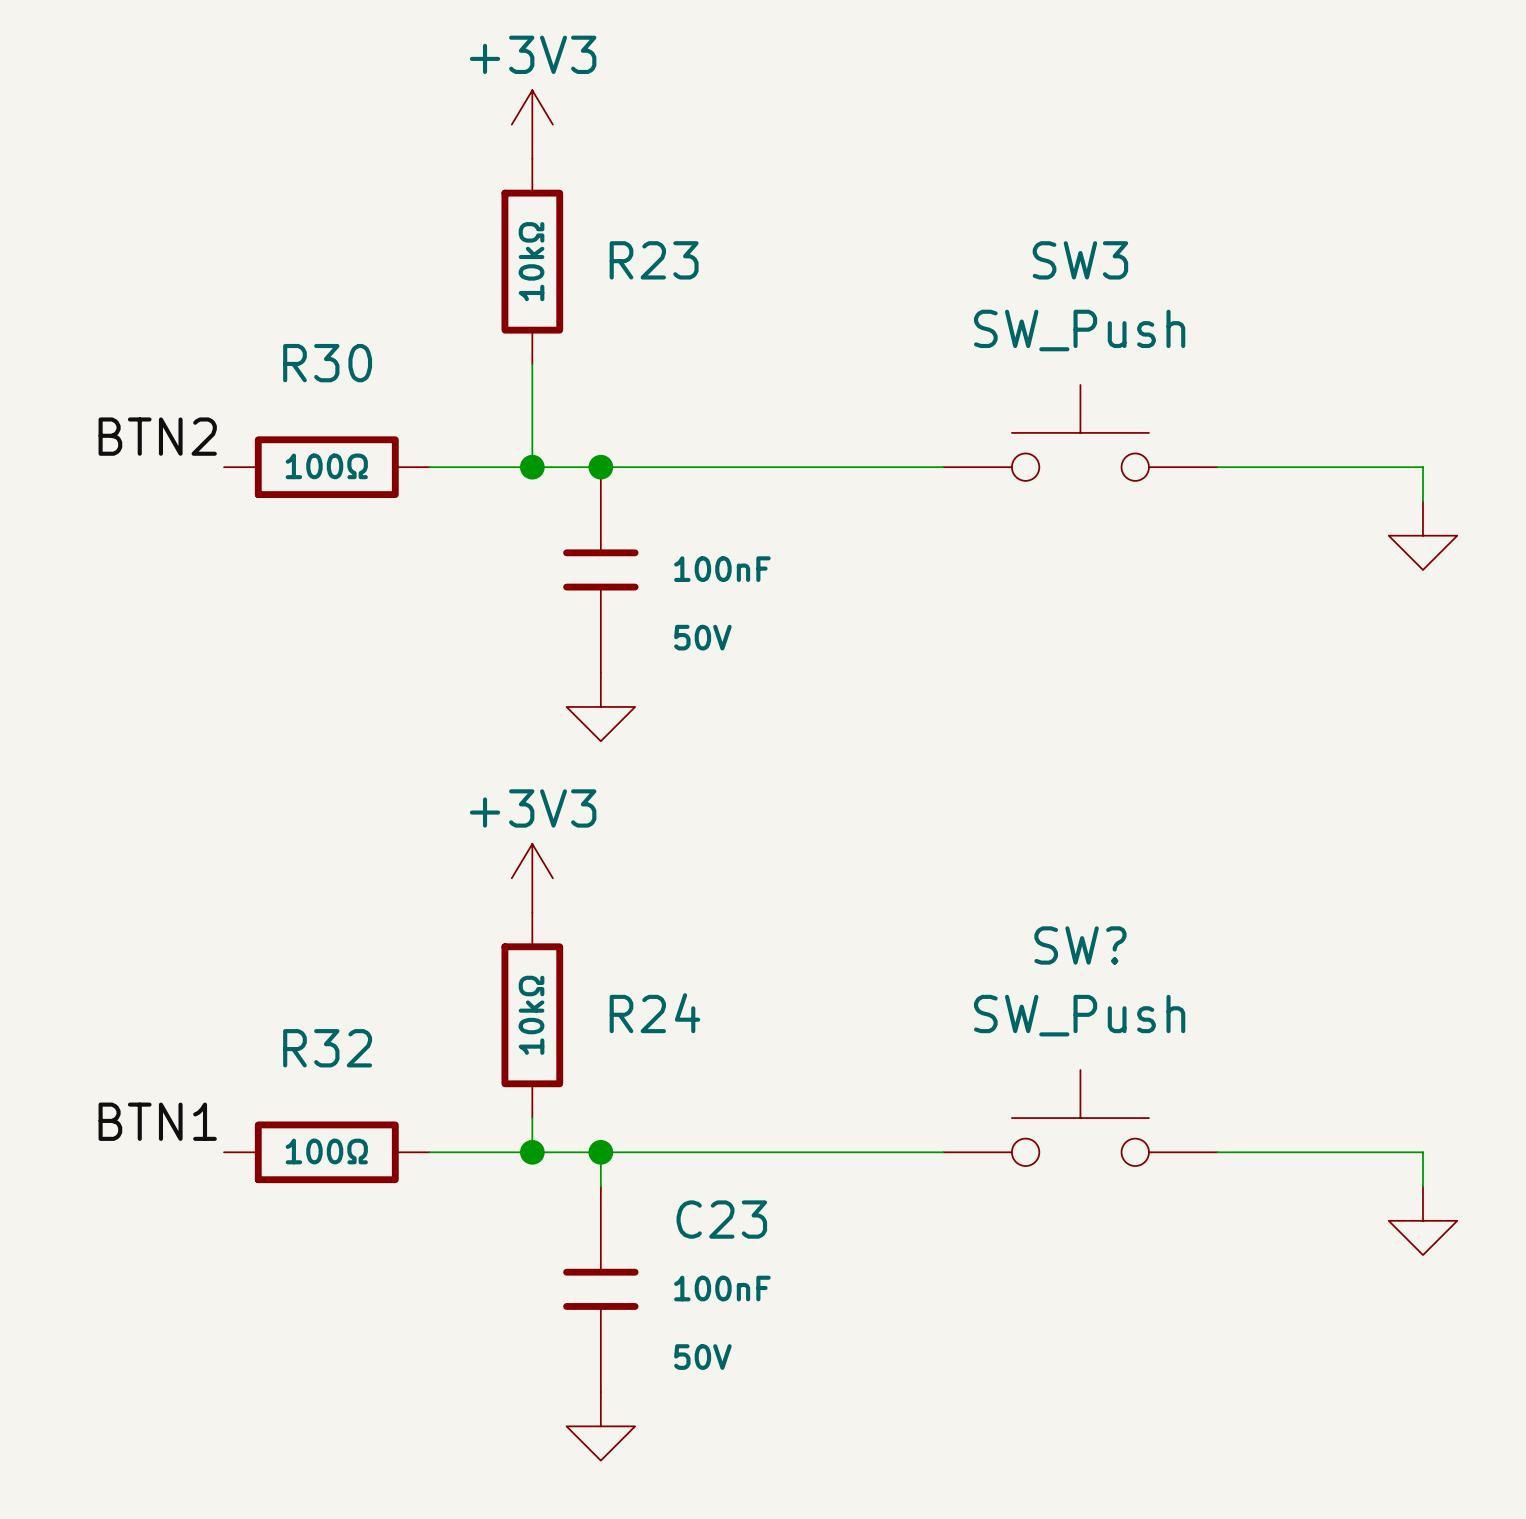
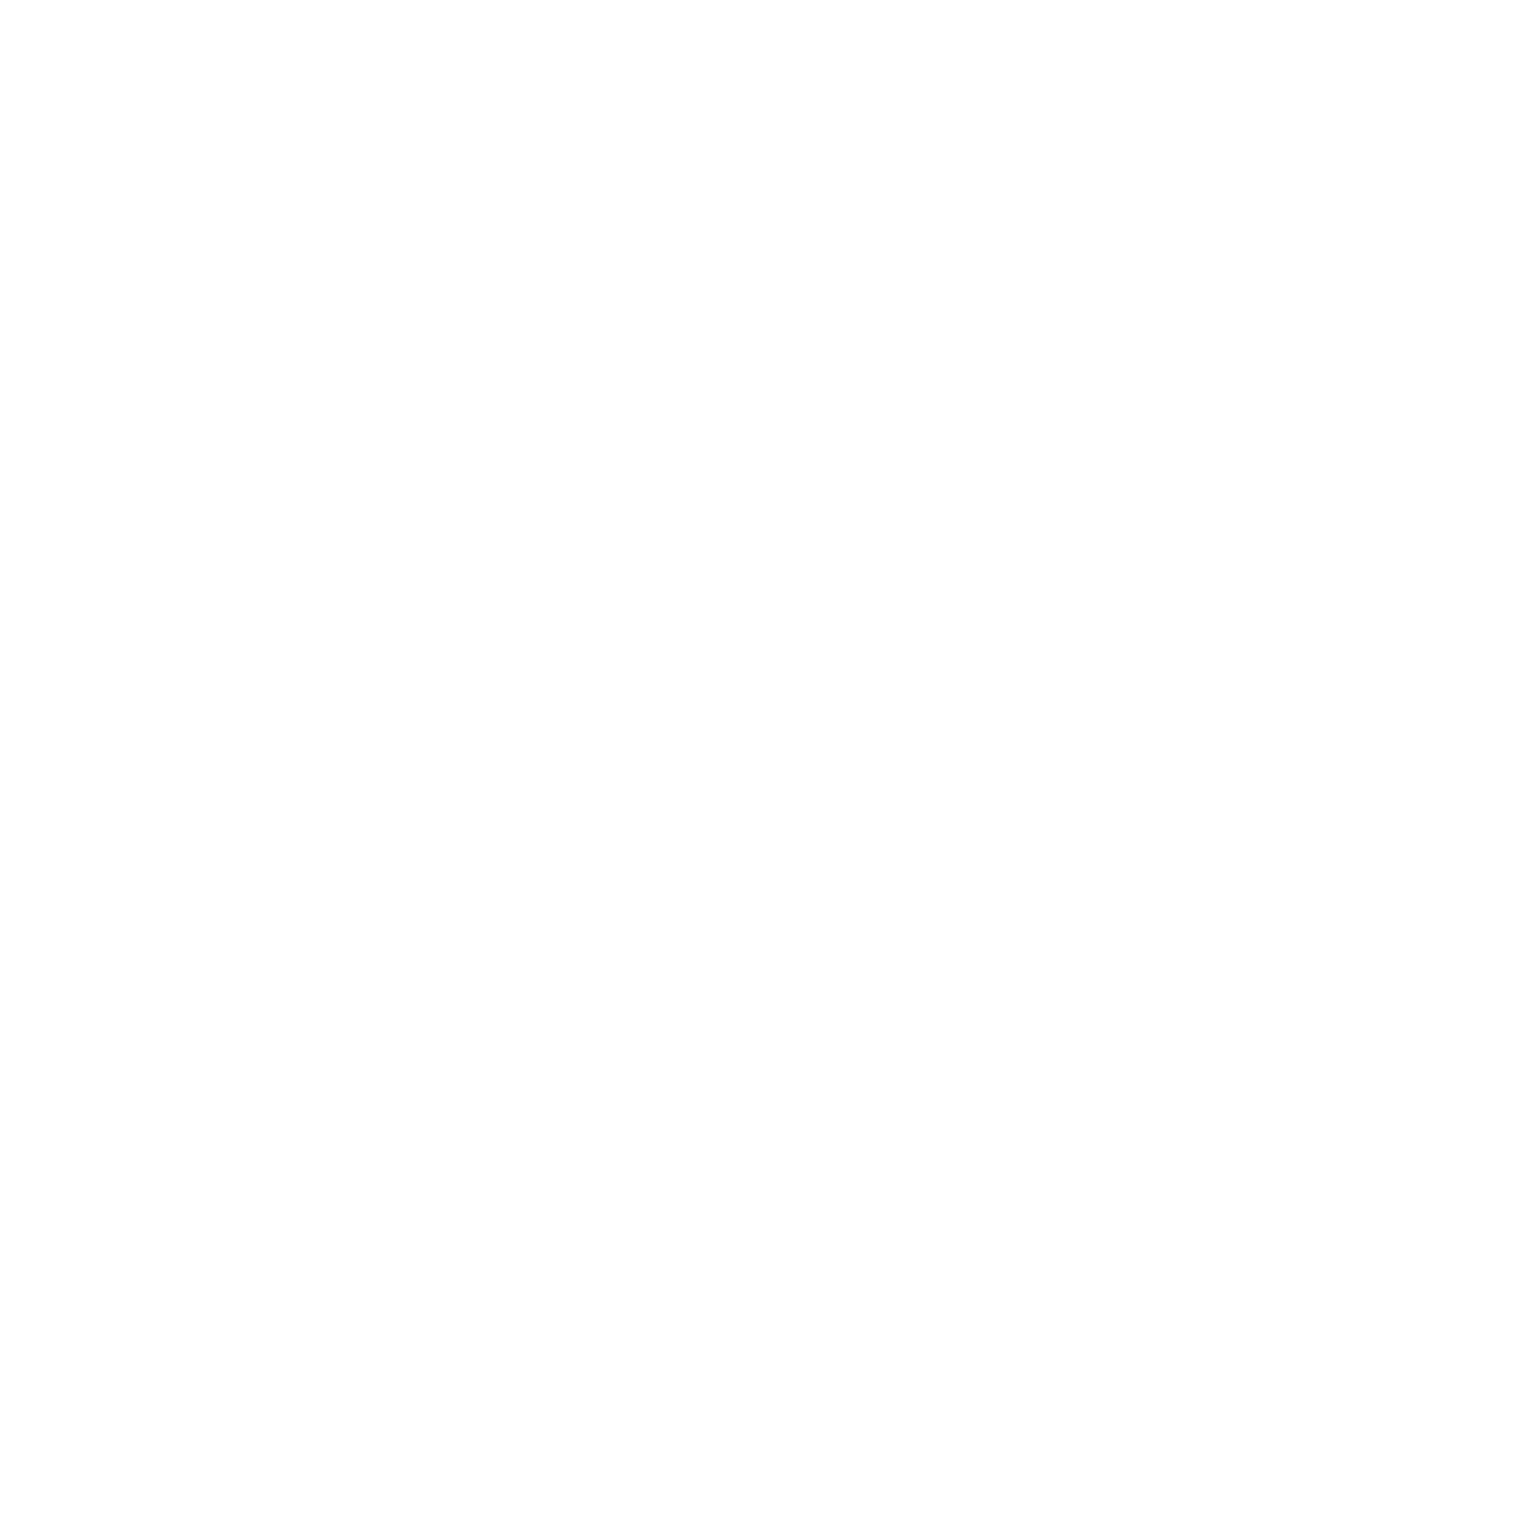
power symbol: +3V3 (532, 124) -> none
R23: 10kΩ (532, 261) -> none
wire: (532, 364) (532, 467) -> none
SW3: SW_Push (1080, 432) -> none
label: BTN2 (157, 436) -> none
R30: 100Ω (326, 467) -> none
wire: (429, 467) (943, 467) -> none
junction: (532, 467) -> none
junction: (600, 467) -> none
wire: (1217, 467) (1423, 467) (1423, 501) -> none
power symbol: (1423, 535) -> none
part: 100nF (600, 569) -> none
power symbol: (600, 706) -> none
power symbol: +3V3 (532, 878) -> none
R24: 10kΩ (532, 1015) -> none
wire: (532, 1118) (532, 1152) -> none
SW?: SW_Push (1080, 1118) -> none
label: BTN1 (157, 1121) -> none
R32: 100Ω (326, 1152) -> none
wire: (429, 1152) (943, 1152) -> none
junction: (532, 1152) -> none
wire: (600, 1152) (600, 1186) -> none
junction: (600, 1152) -> none
wire: (1217, 1152) (1423, 1152) (1423, 1186) -> none
power symbol: (1423, 1220) -> none
C23: 100nF (600, 1289) -> none
power symbol: (600, 1426) -> none

